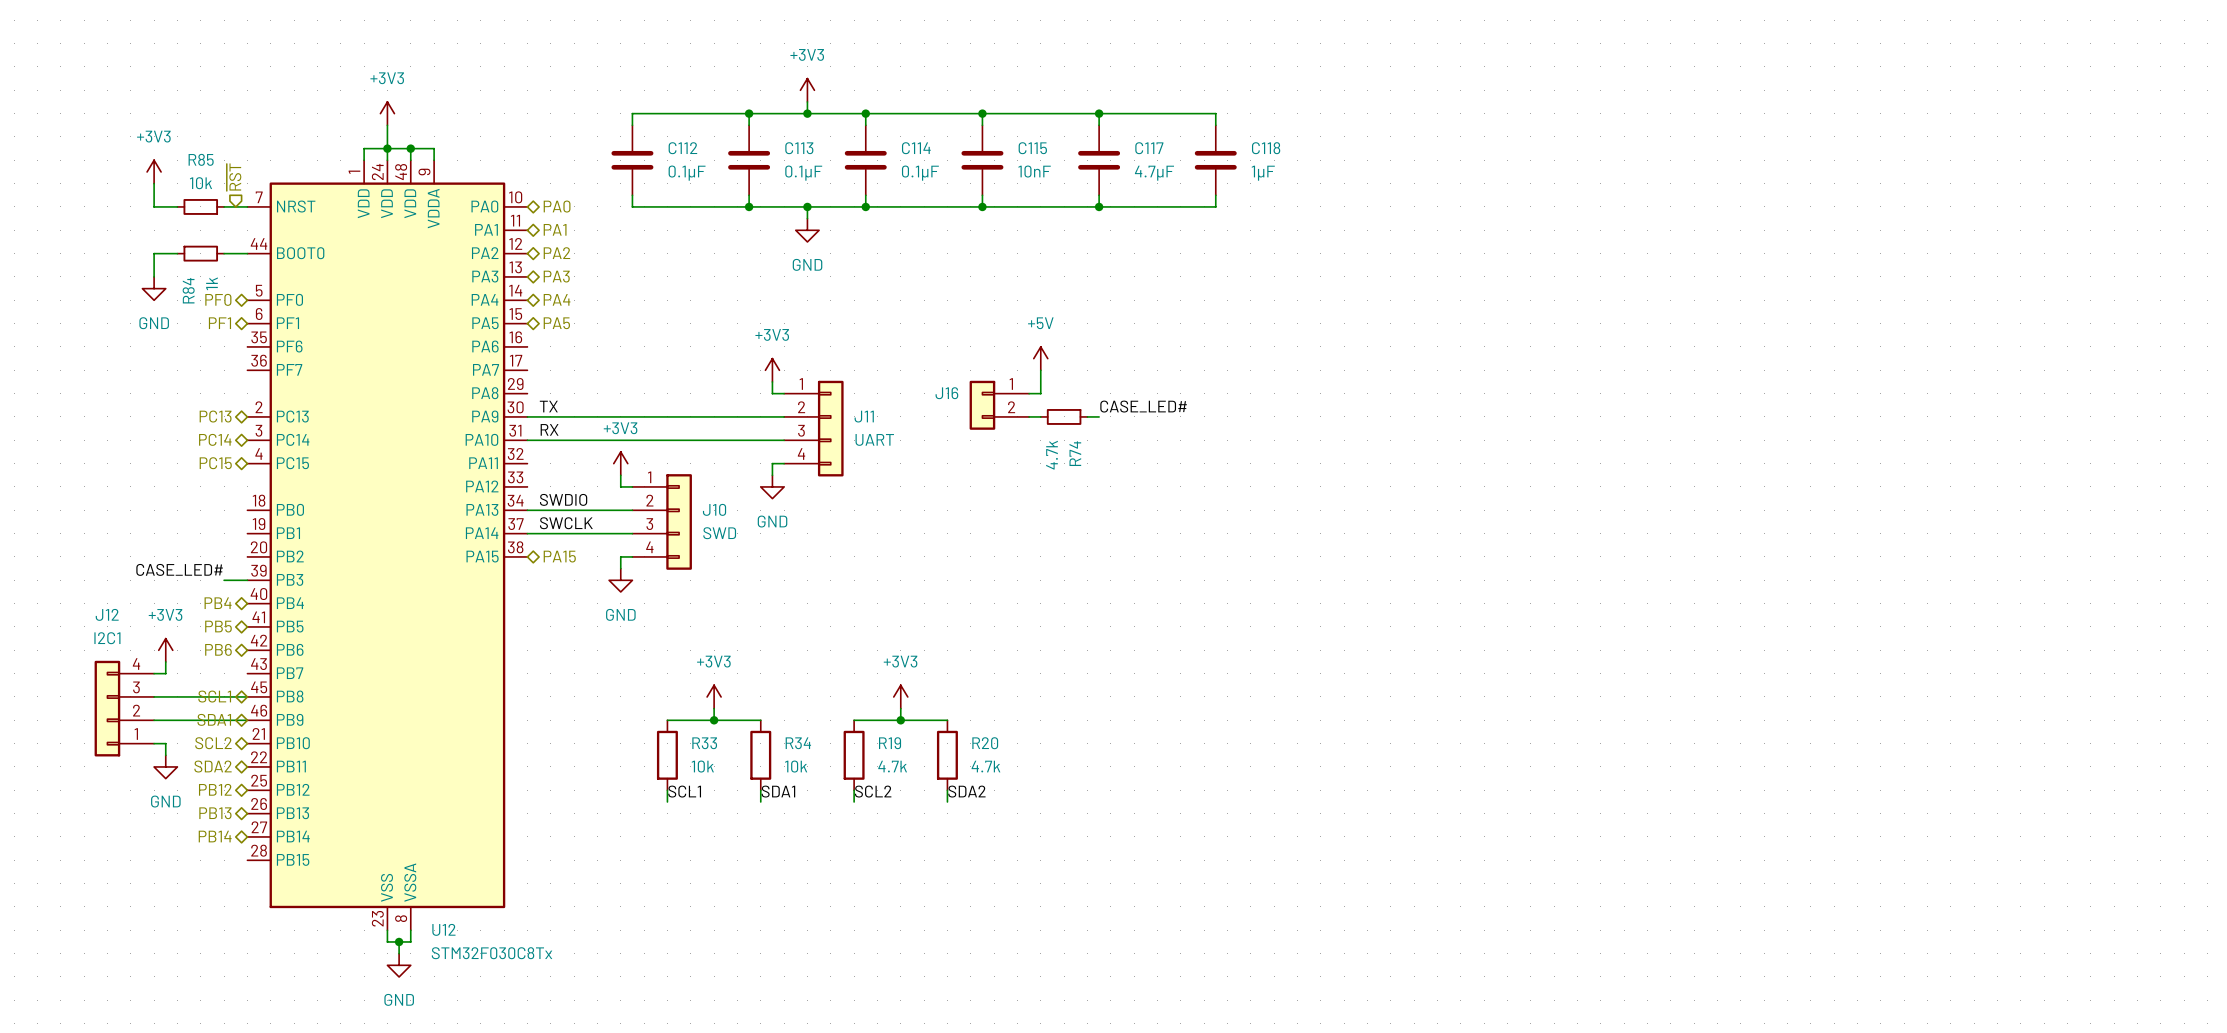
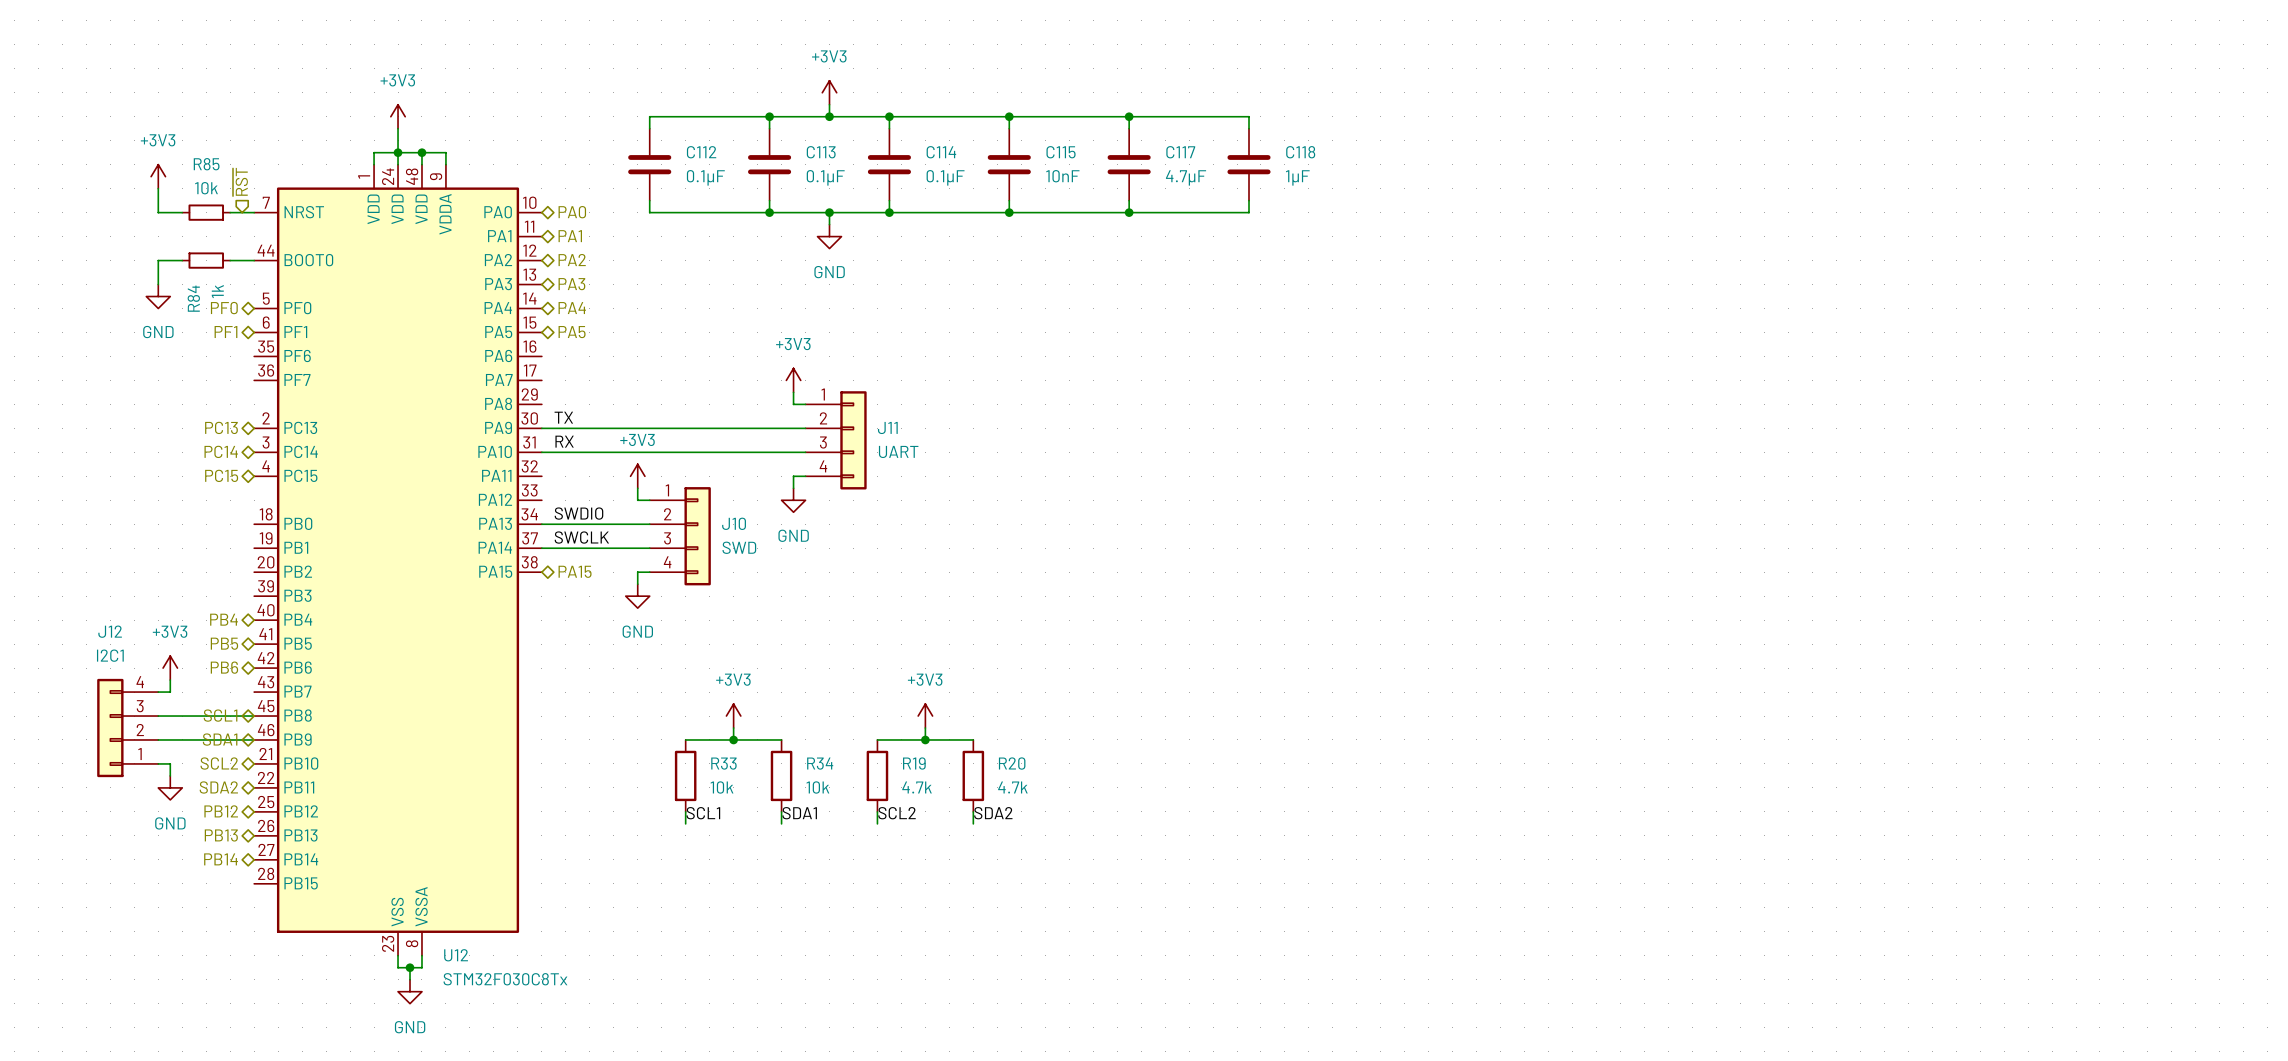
power symbol: +5V (1040, 358) -> none
wire: (1040, 370) (1040, 393) (1029, 393) -> none
J16: (999, 405) -> none
label: CASE_LED# (1143, 406) -> none
wire: (1029, 416) (1040, 416) -> none
R74: 4.7k (1064, 416) -> none
wire: (1087, 416) (1099, 416) -> none
label: CASE_LED# (179, 569) -> none
wire: (224, 580) (247, 580) -> none

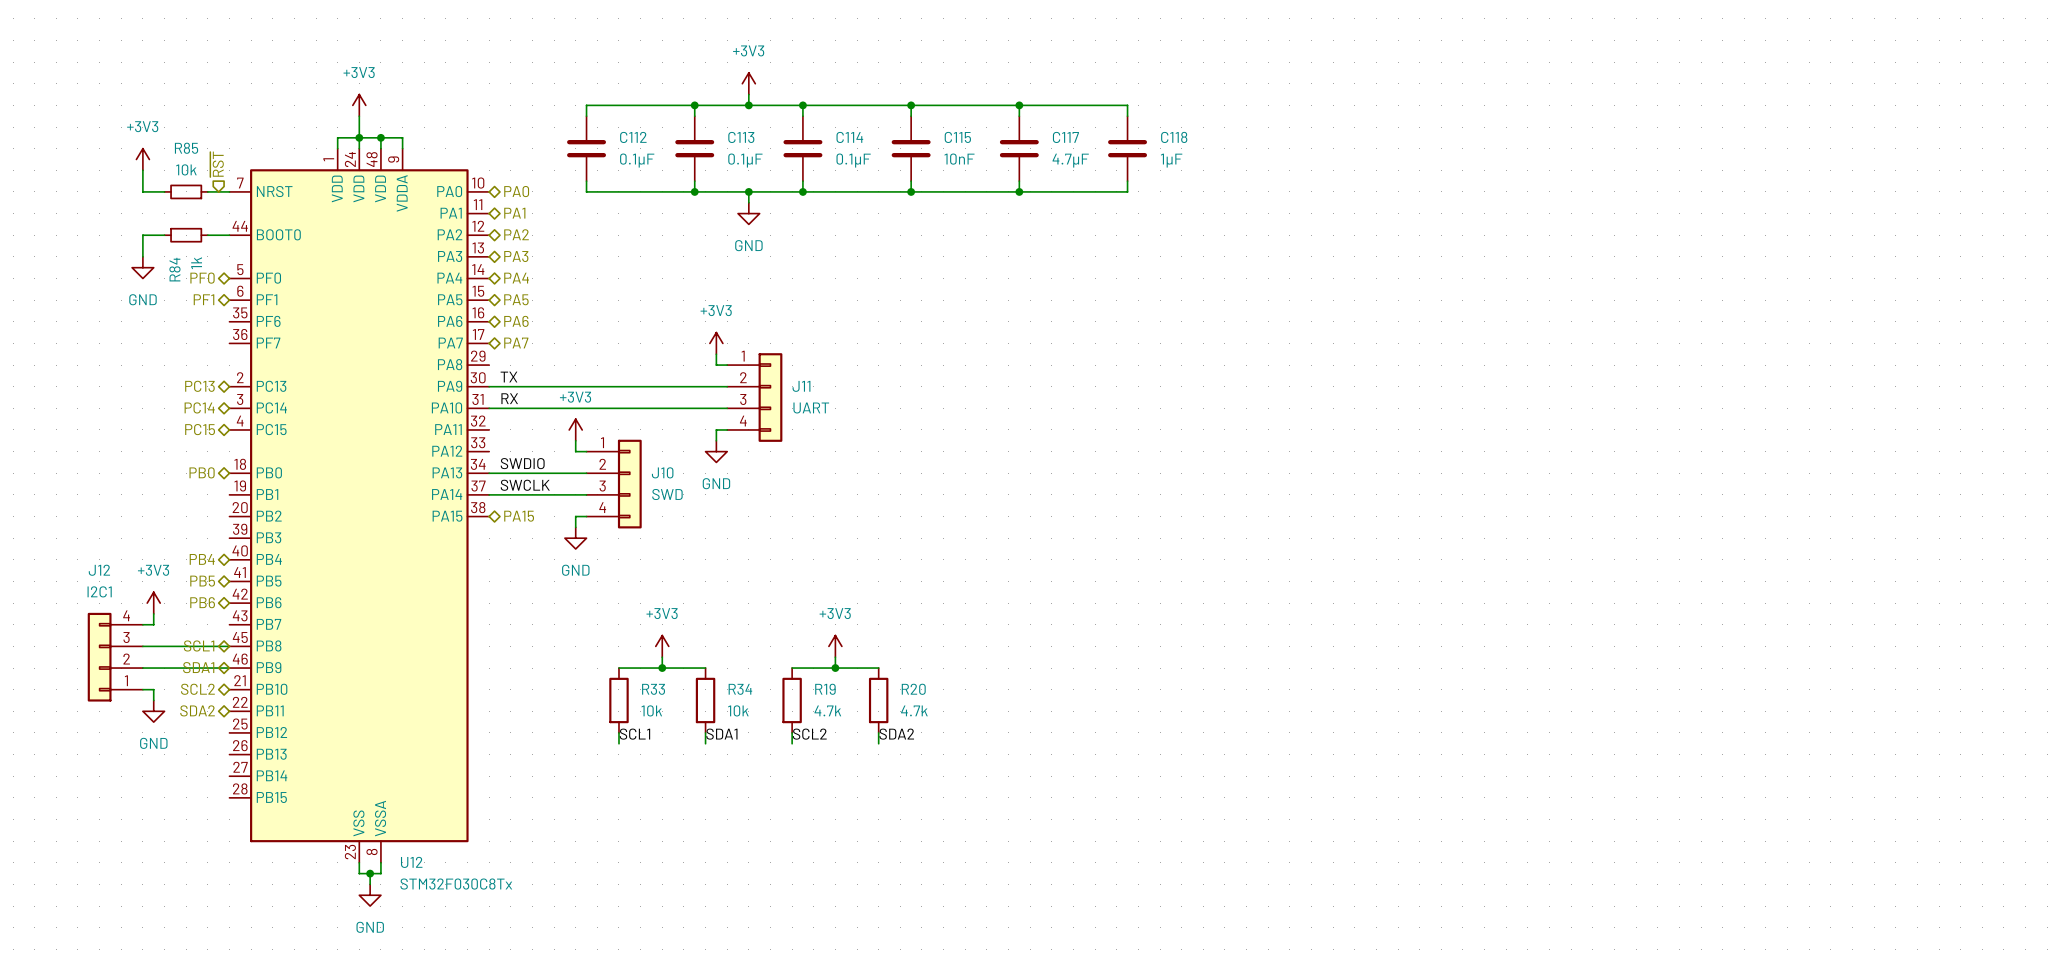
hierarchical label: none -> PA6 (516, 321)
hierarchical label: none -> PA7 (516, 343)
hierarchical label: none -> PB0 (202, 472)
hierarchical label: PB12 (221, 811) -> none
hierarchical label: PB13 (221, 835) -> none
hierarchical label: PB14 (221, 859) -> none

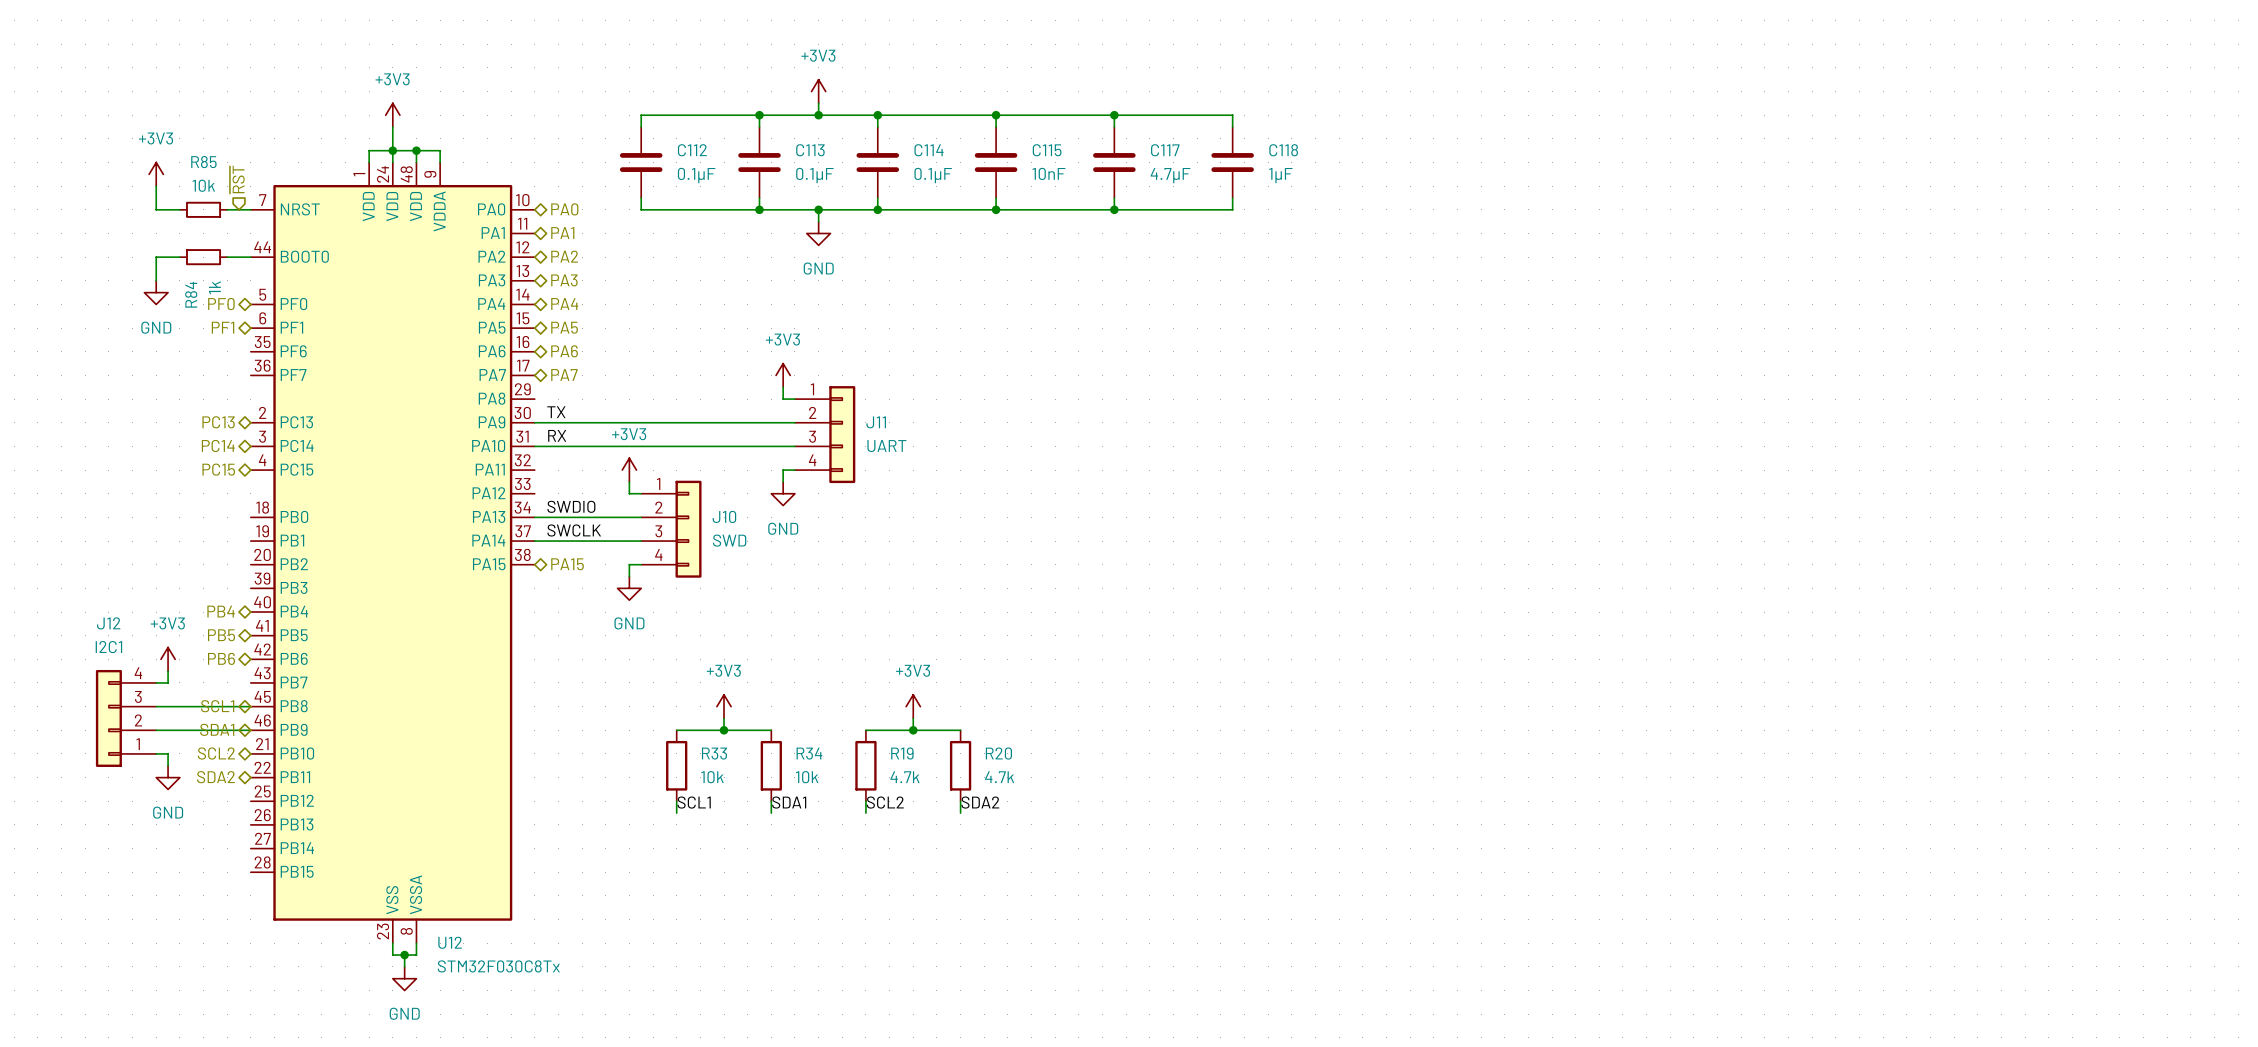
hierarchical label: PB0 (202, 472) -> none

